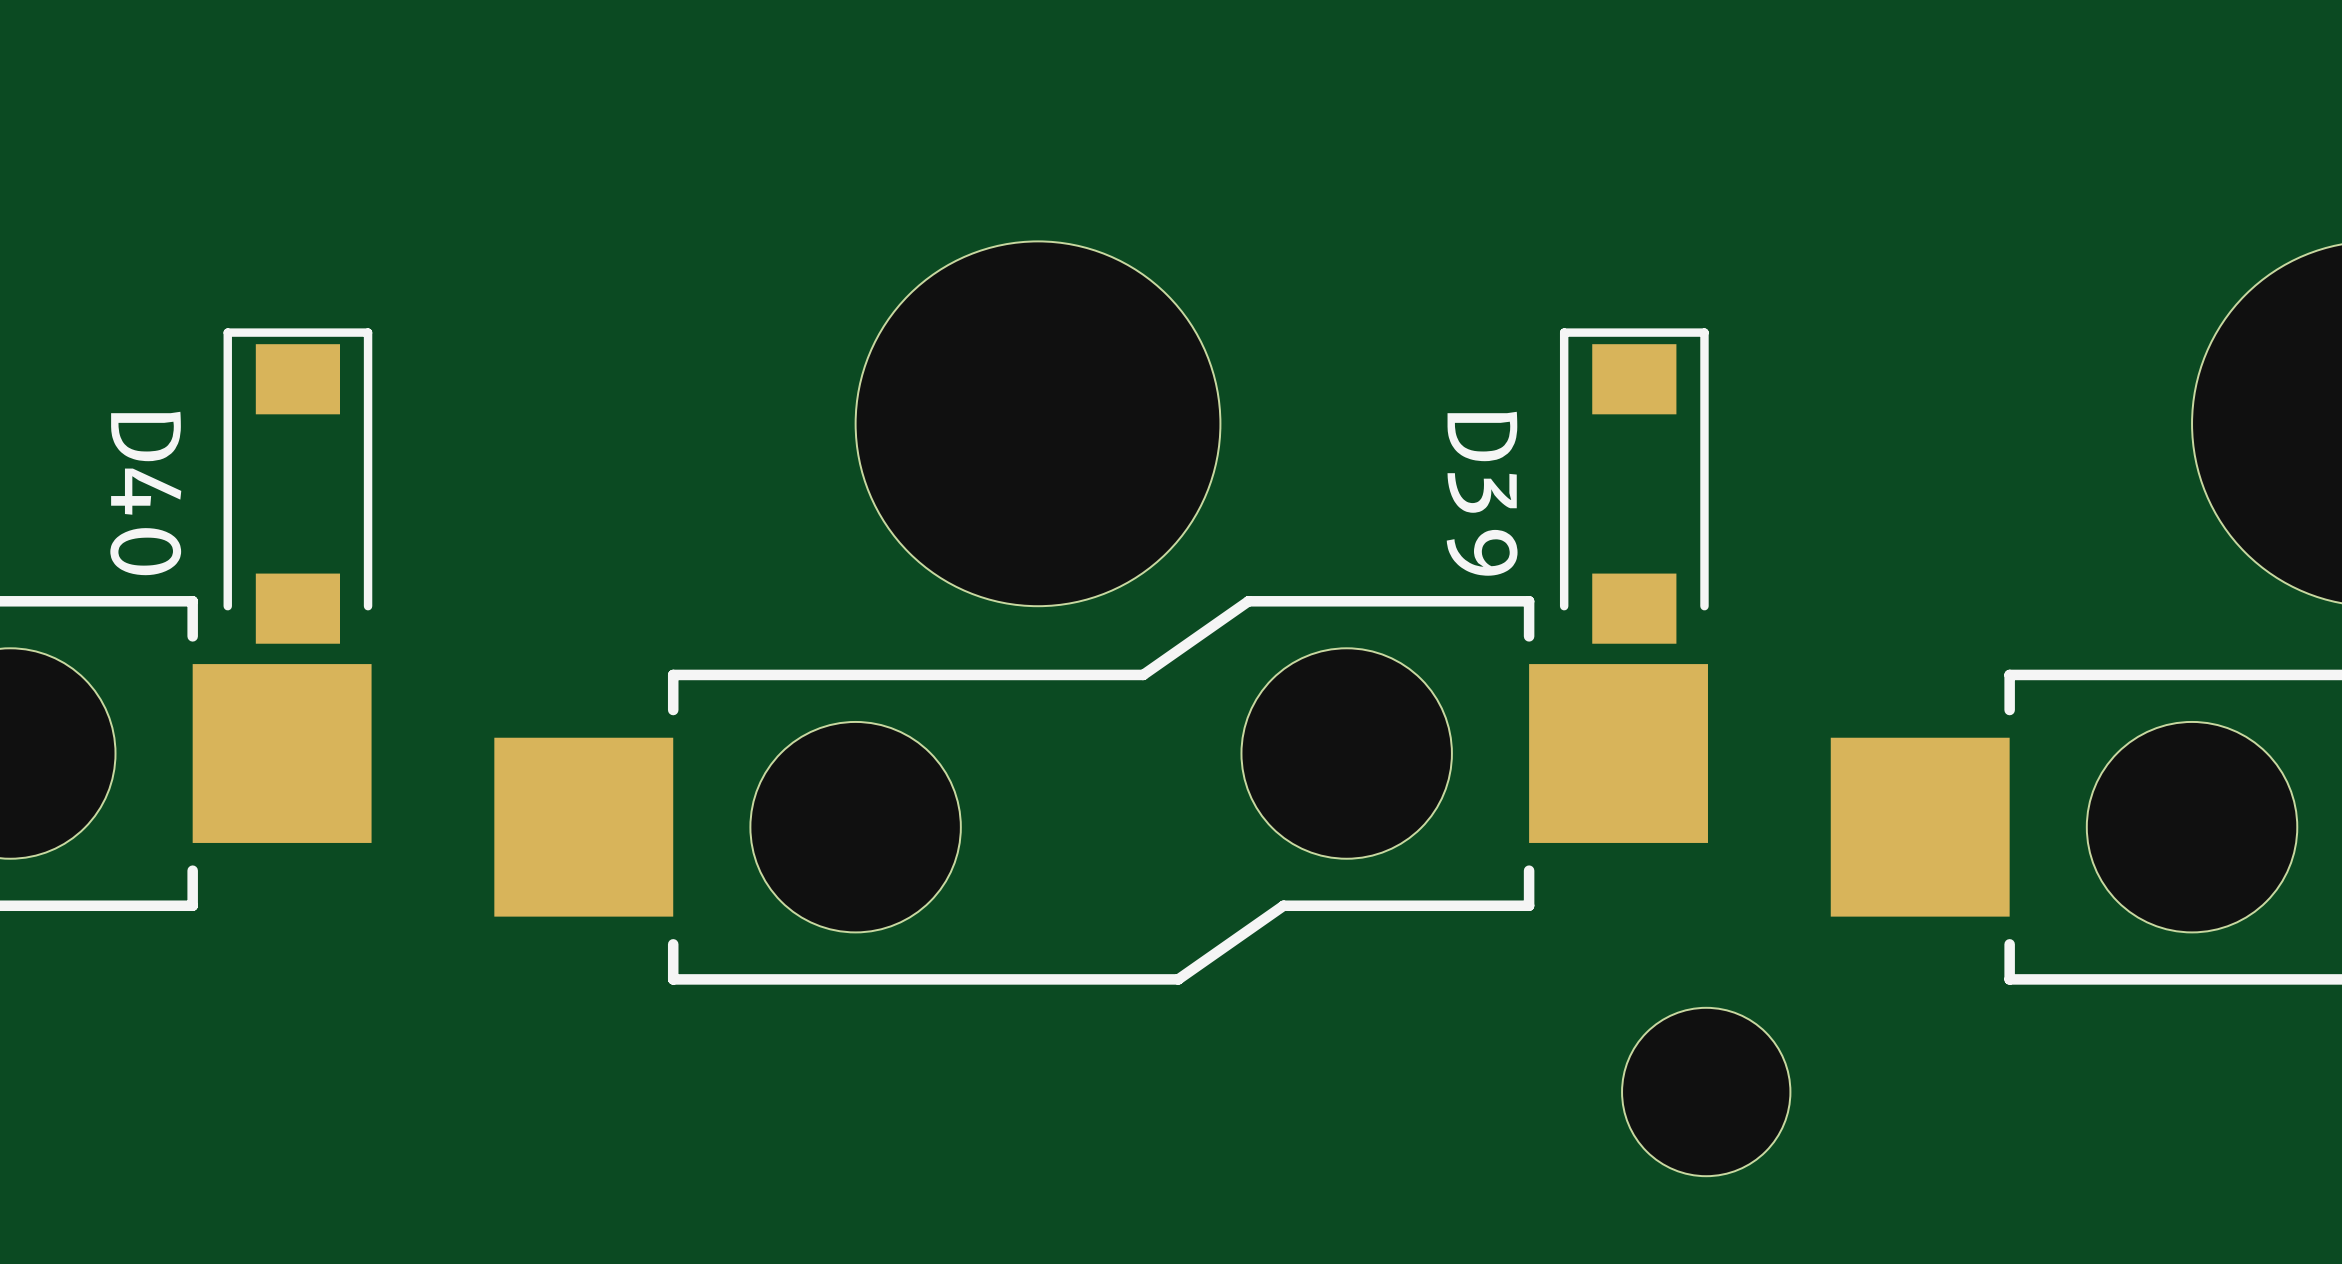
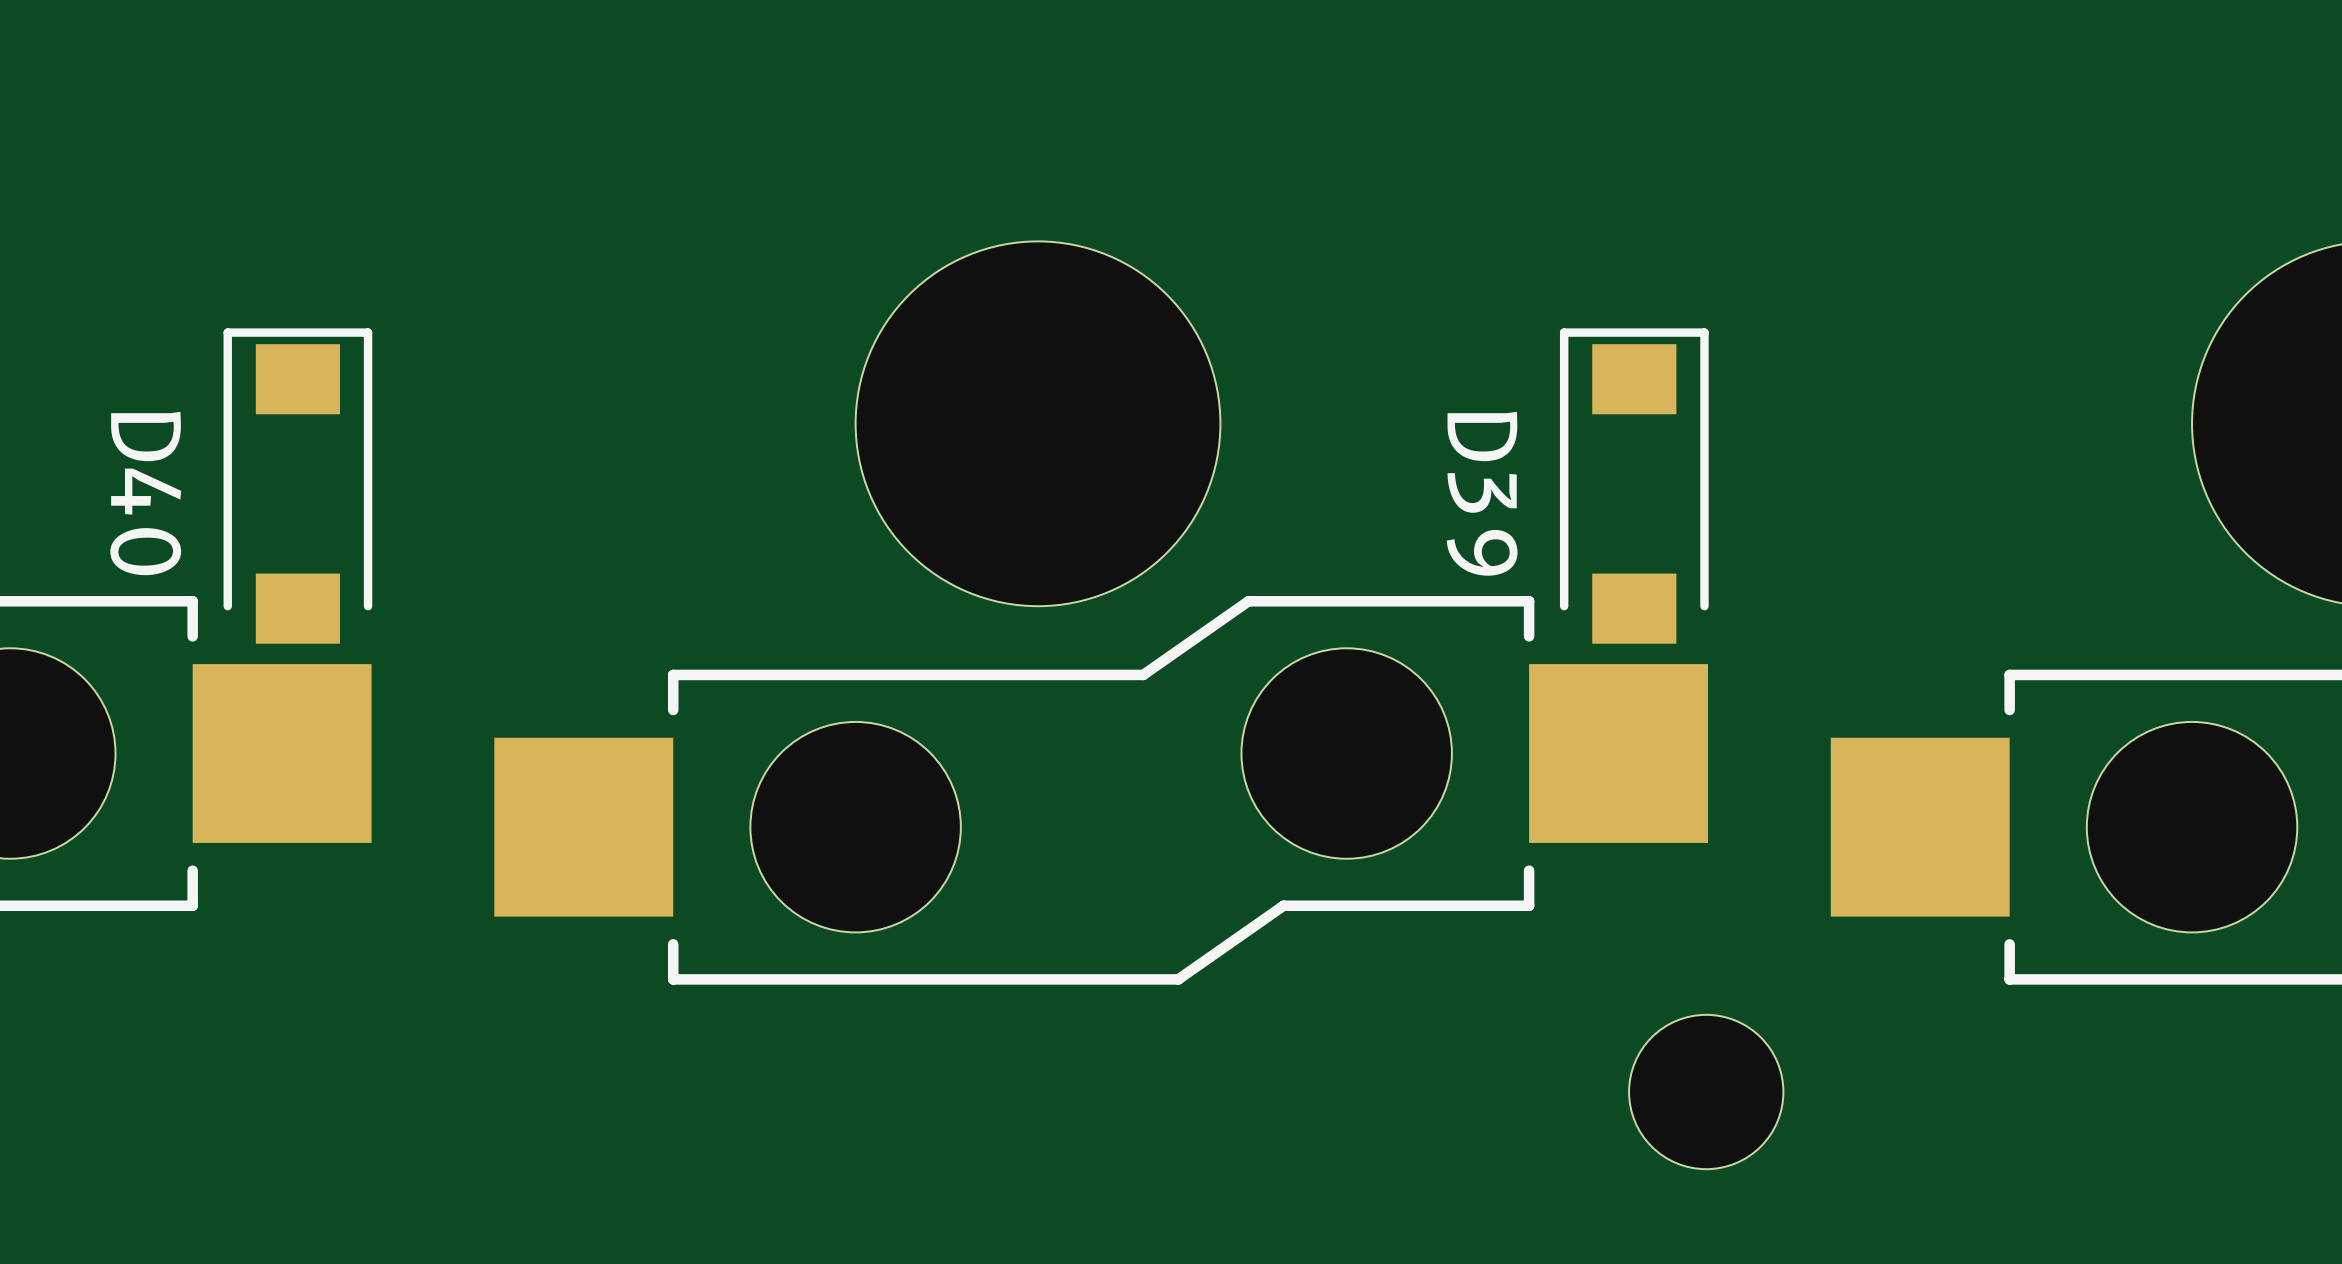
part footprint: [1622, 1007, 1791, 1177] -> [1629, 1014, 1784, 1170]

